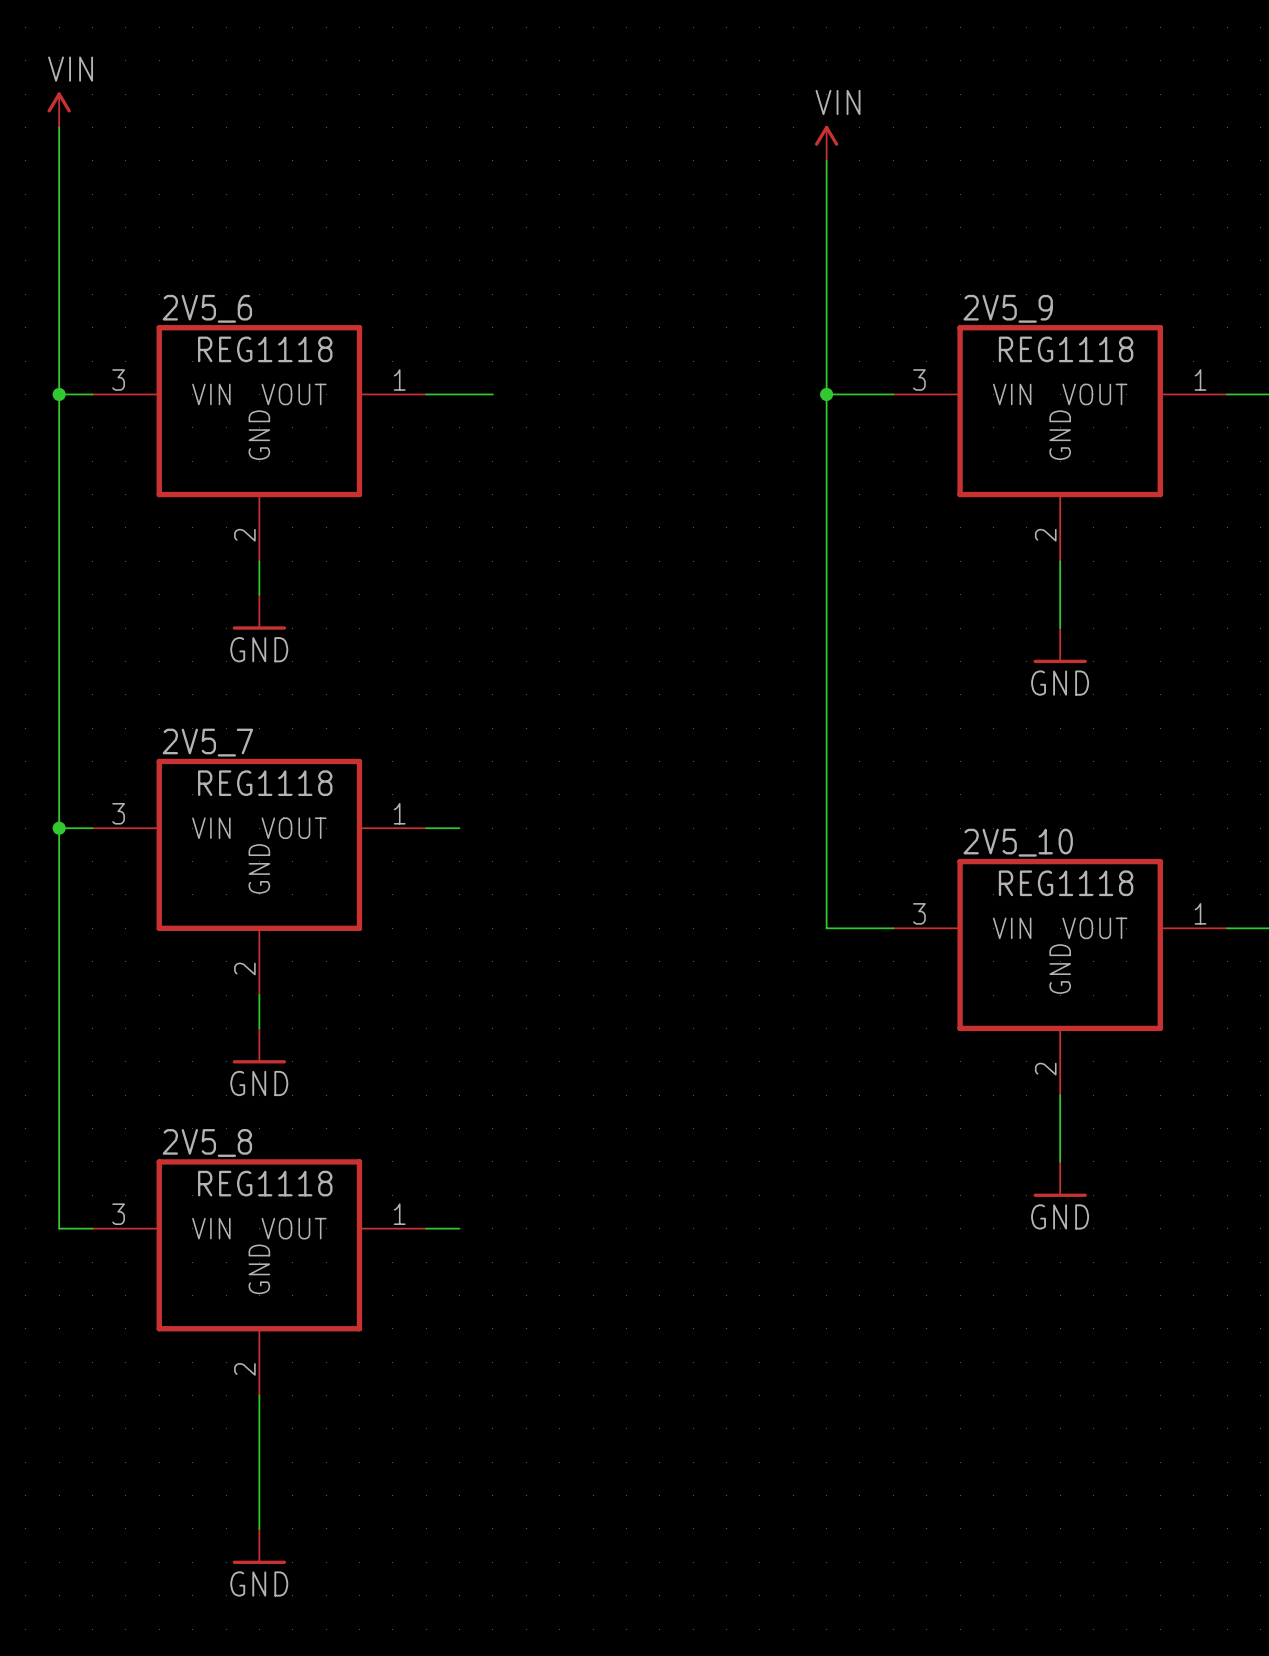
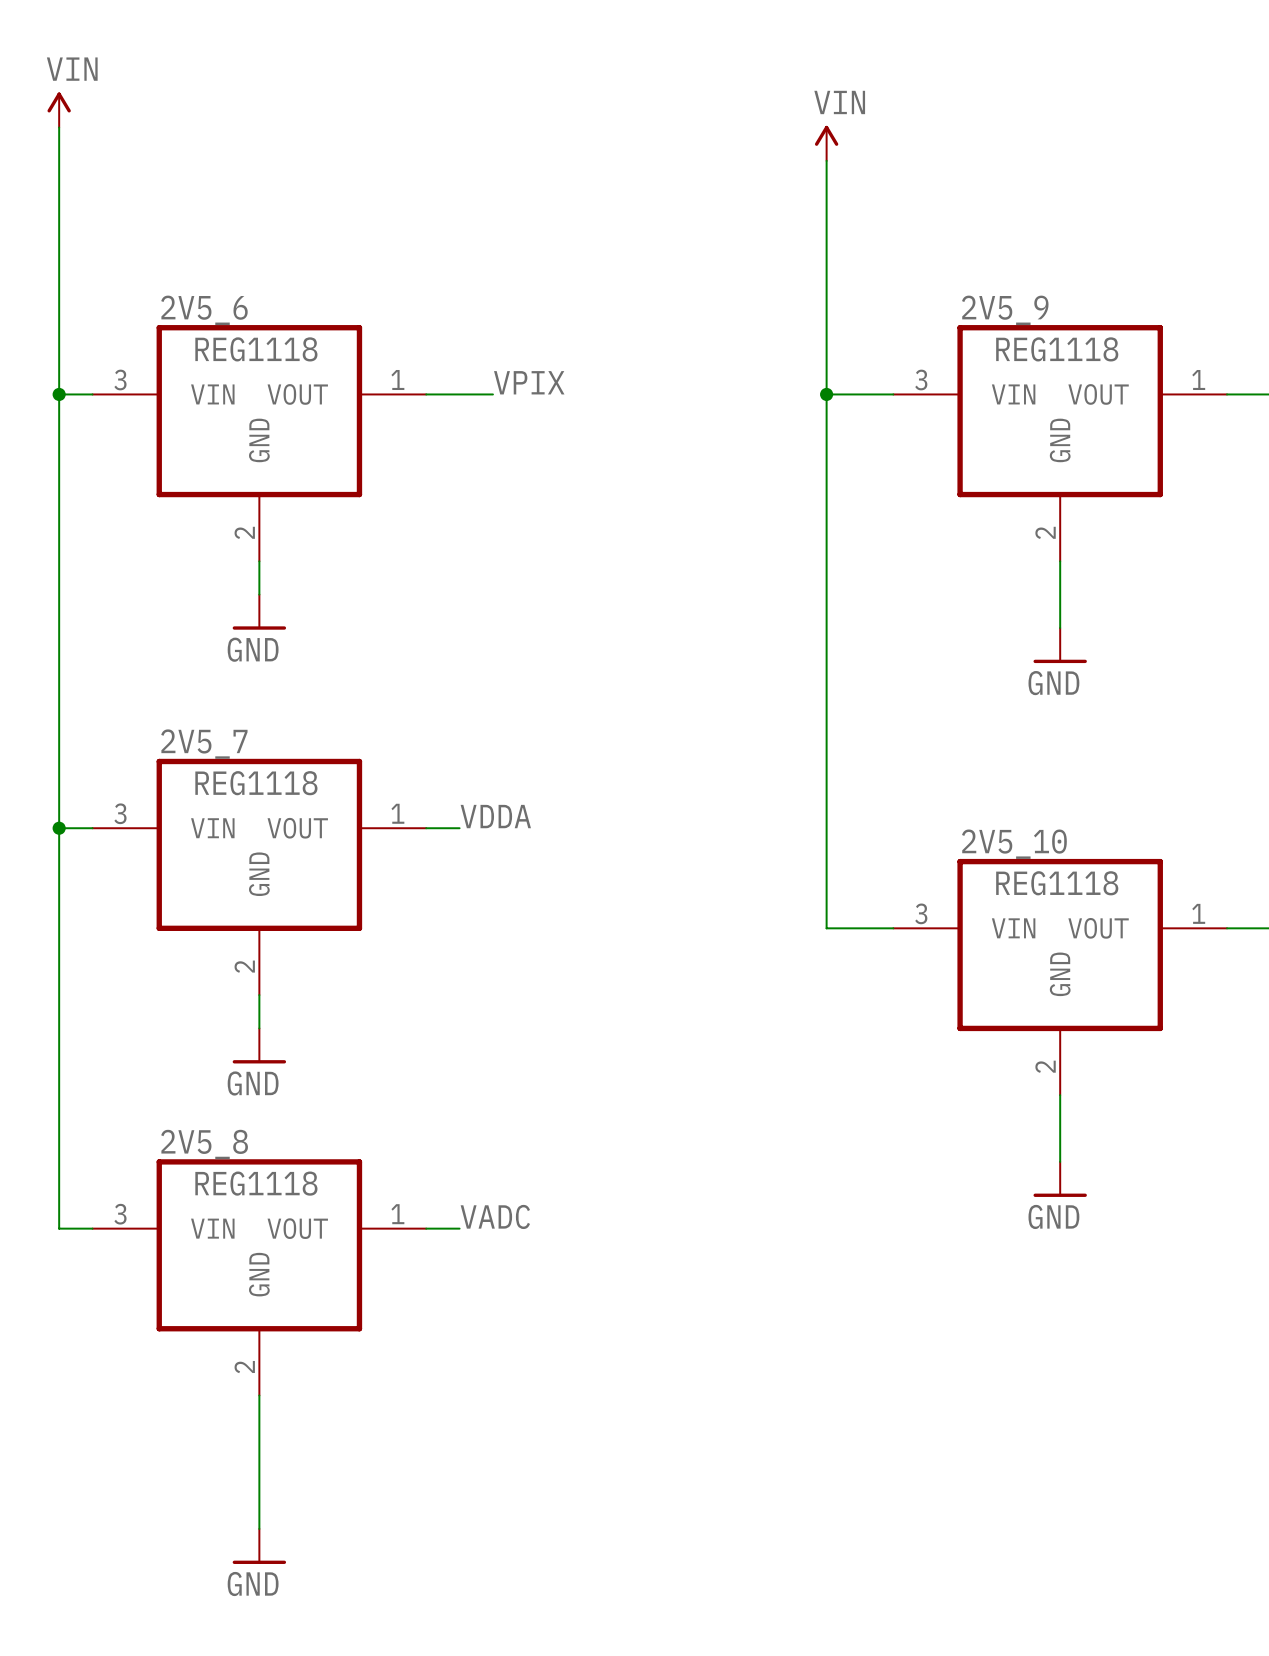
label: none -> VPIX (529, 382)
label: none -> VDDA (495, 816)
label: none -> VADC (495, 1216)

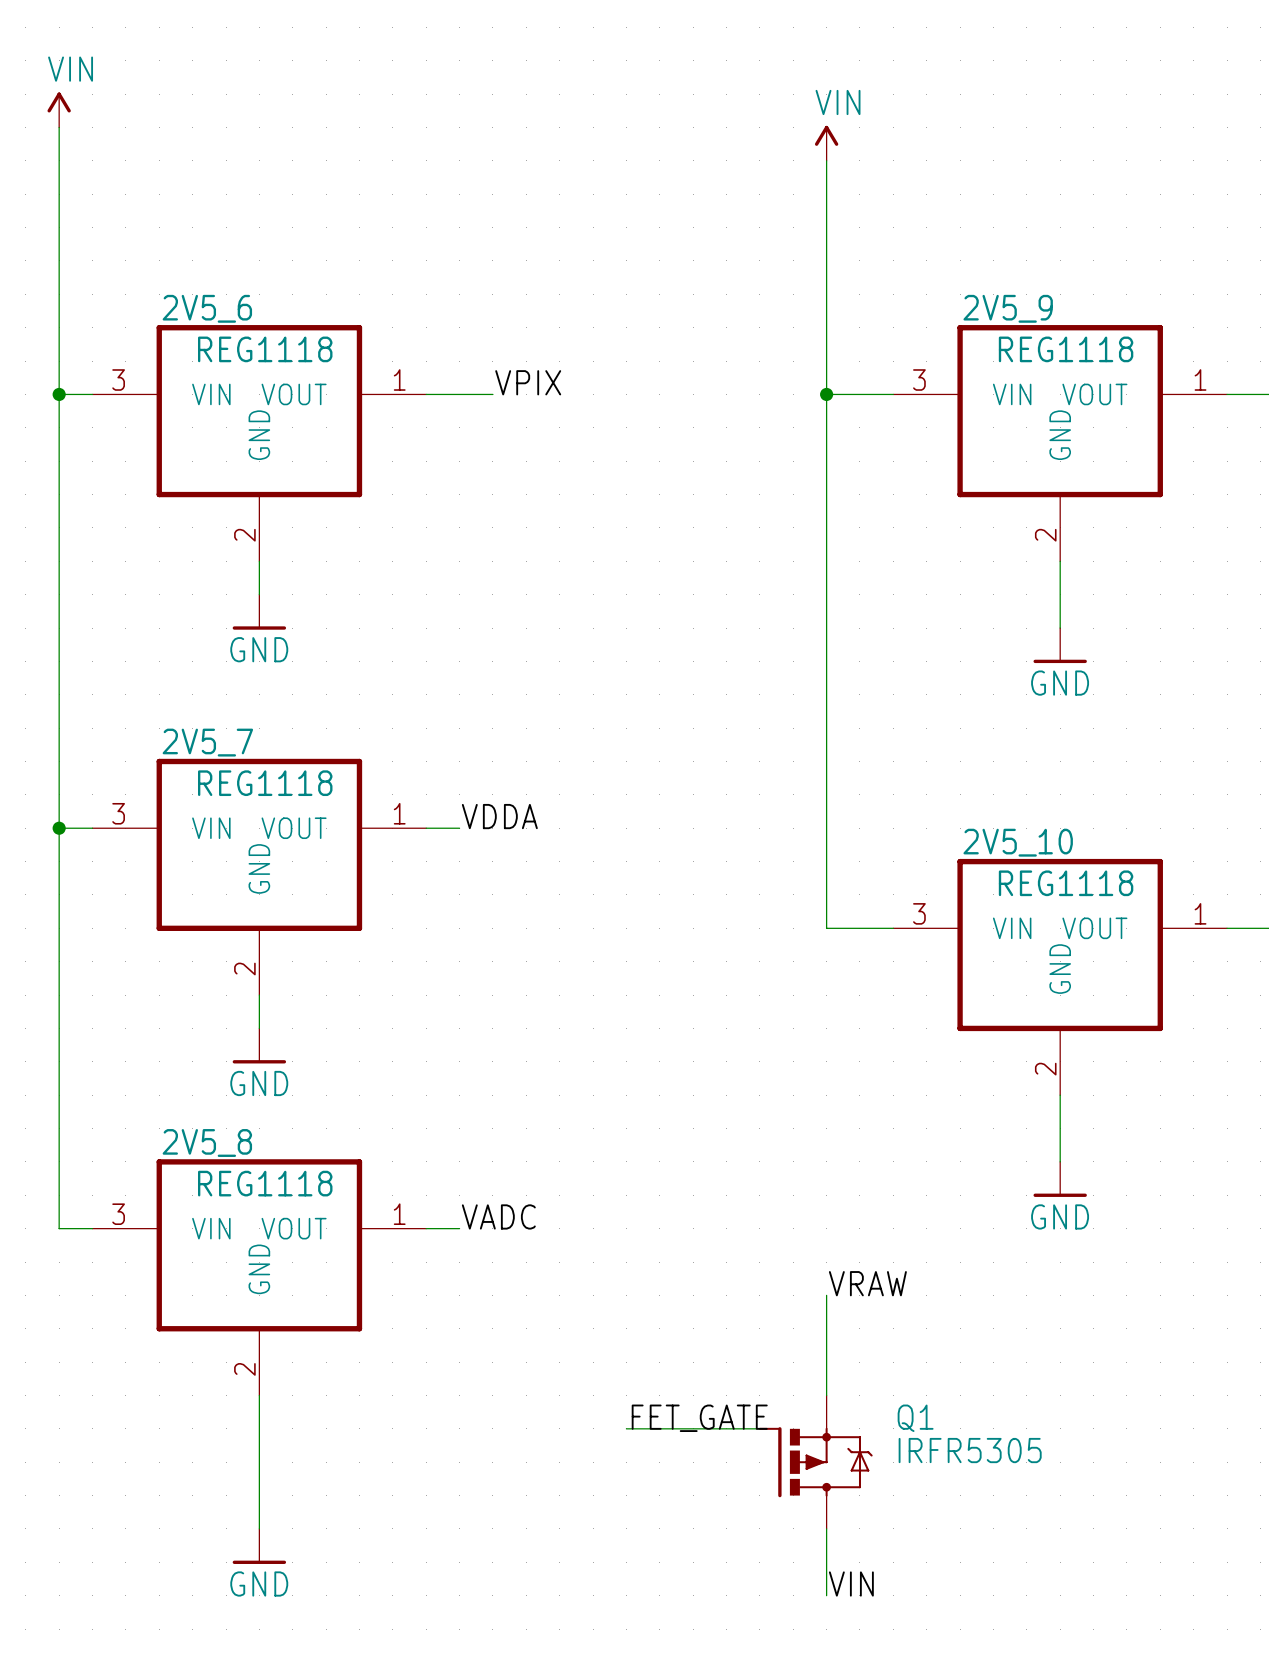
label: none -> VRAW (867, 1283)
wire: none -> (826, 1295) (826, 1395)
label: none -> FET_GATE (699, 1418)
wire: none -> (626, 1428) (759, 1428)
Q1: none -> IRFR5305 (815, 1462)
wire: none -> (826, 1528) (826, 1595)
label: none -> VIN (851, 1584)

